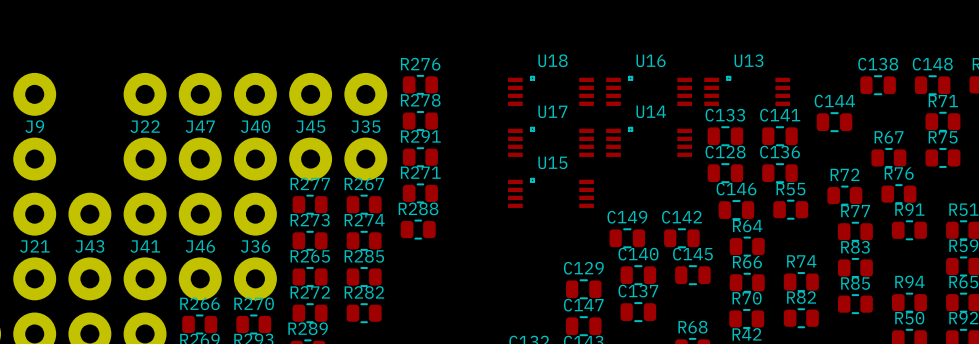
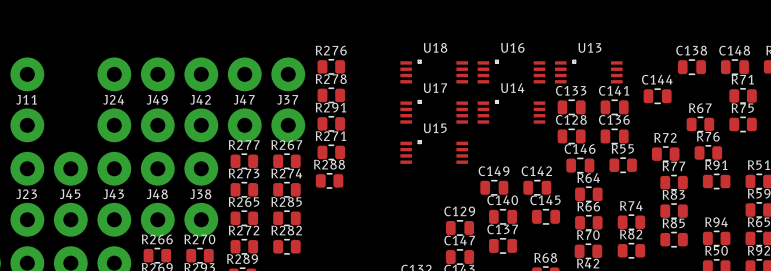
J9 name: J9 (34, 126) -> J11 (26, 99)
J22 name: J22 (145, 126) -> J24 (113, 99)
J47 name: J47 (200, 126) -> J49 (157, 99)
J40 name: J40 (255, 126) -> J42 (200, 99)
J45 name: J45 (310, 126) -> J47 (244, 99)
J35 name: J35 (365, 126) -> J37 (287, 99)
J21 name: J21 (34, 246) -> J23 (26, 194)
J43 name: J43 (89, 246) -> J45 (70, 194)
J41 name: J41 (145, 246) -> J43 (113, 194)
J46 name: J46 (200, 246) -> J48 (157, 194)
J36 name: J36 (255, 246) -> J38 (200, 194)

